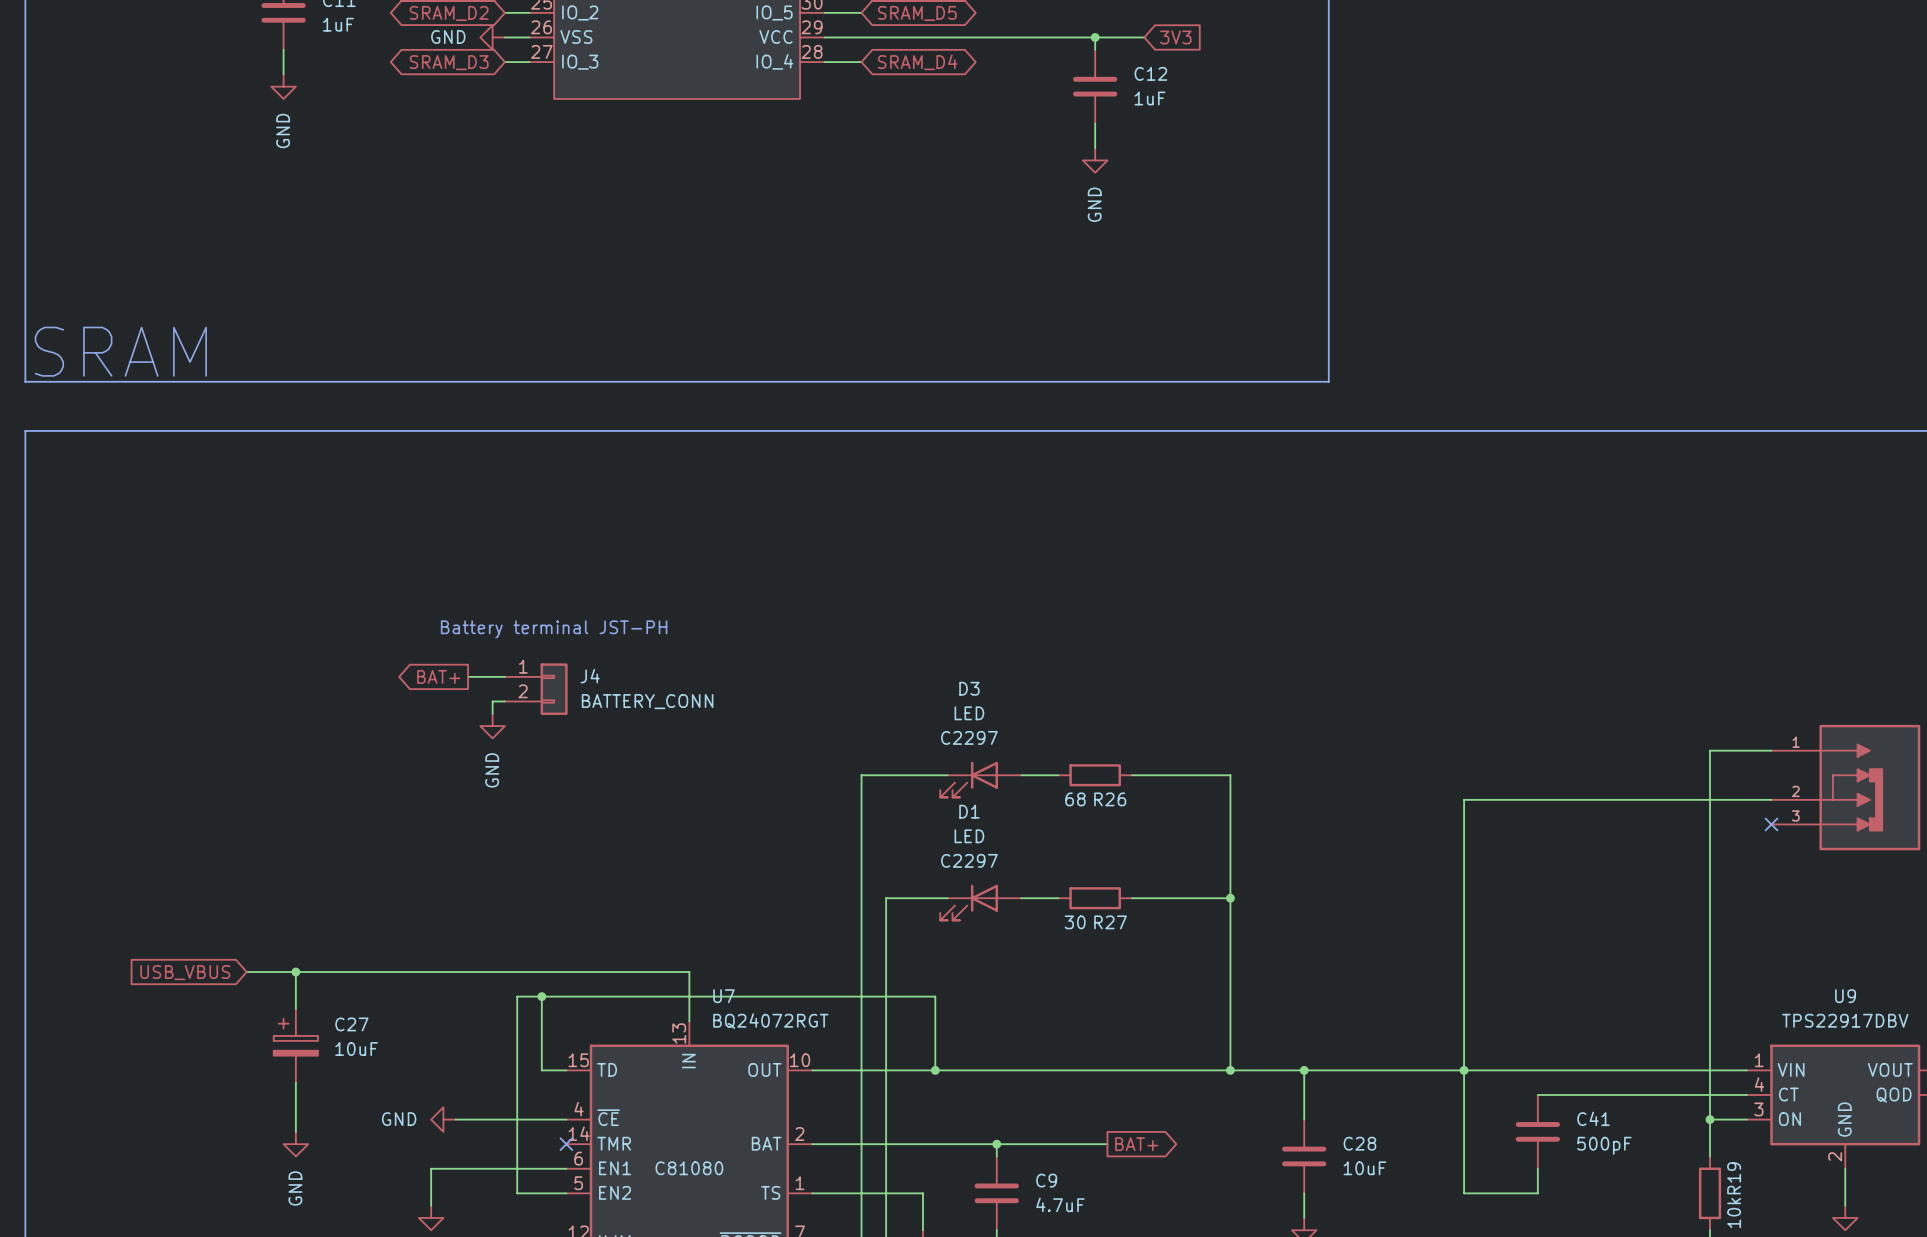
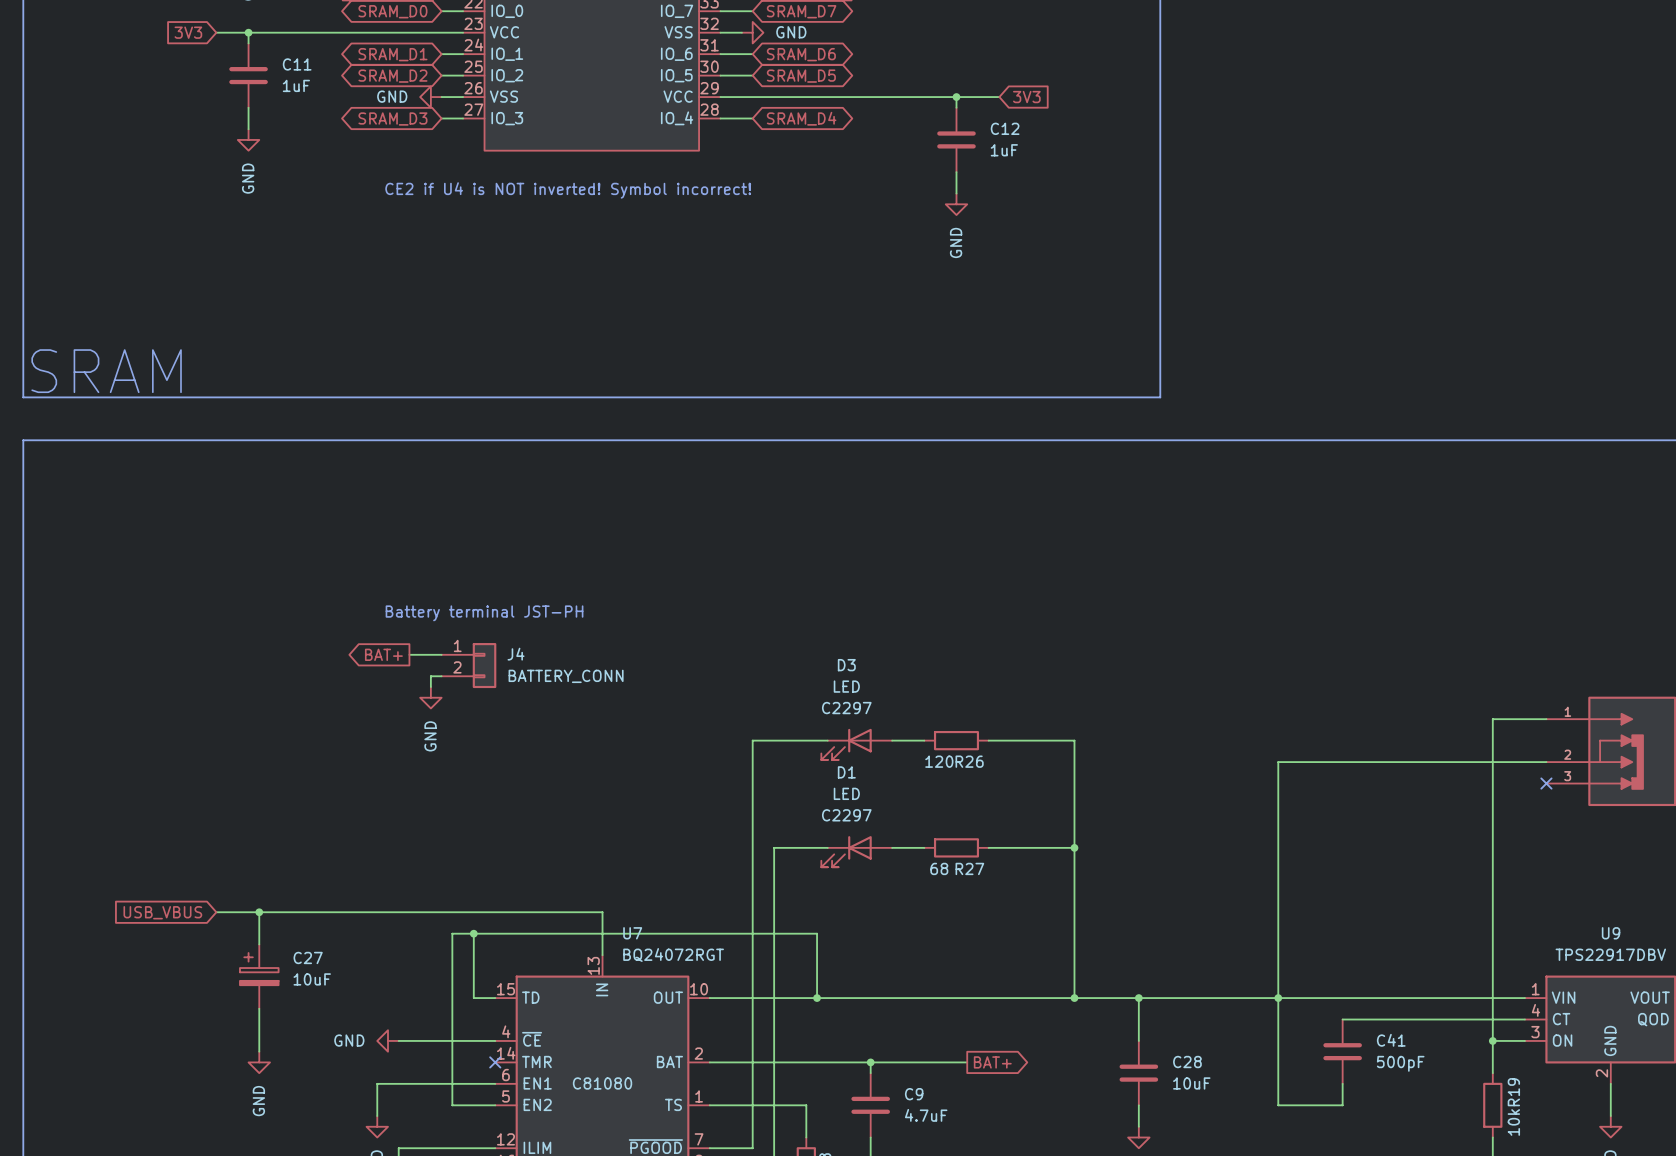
text: none -> CE2 if U4 is NOT inverted! Symbol incorrect! (568, 190)
R26 value: 68 (1075, 799) -> 120 (939, 761)
R27 value: 30 (1075, 922) -> 68 (939, 868)

